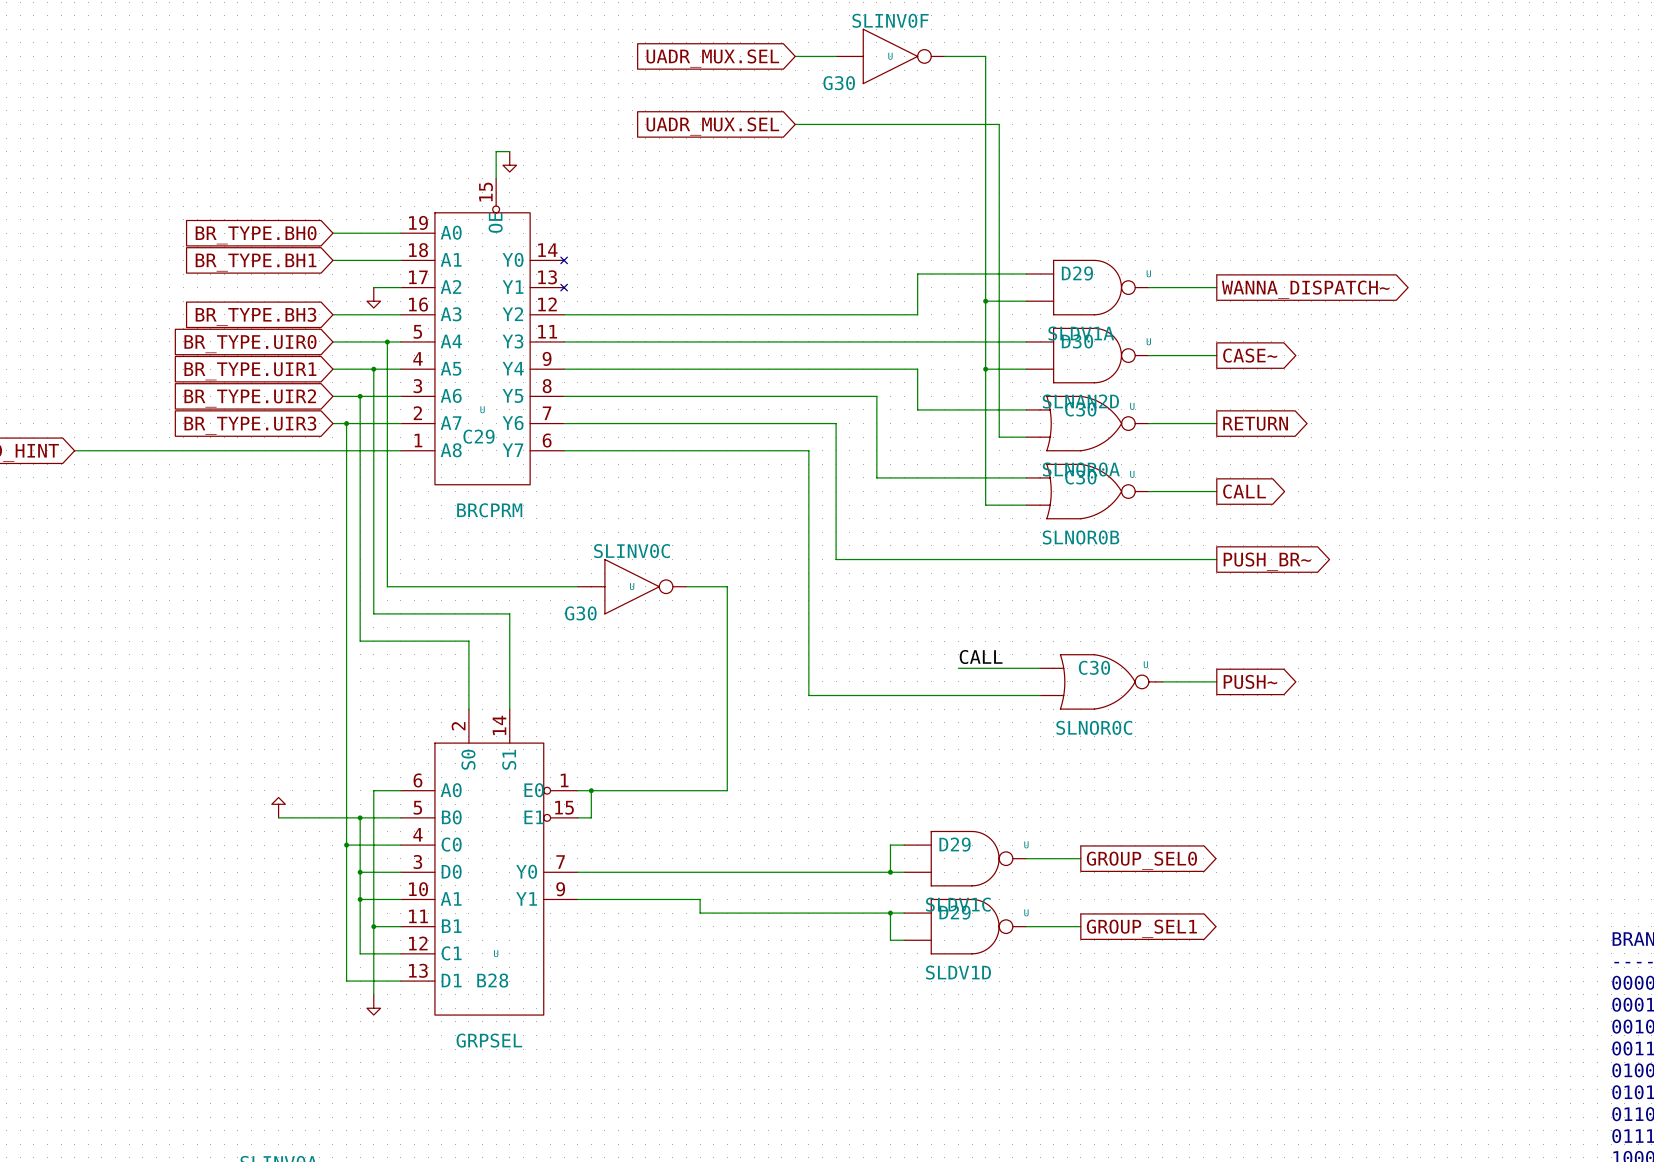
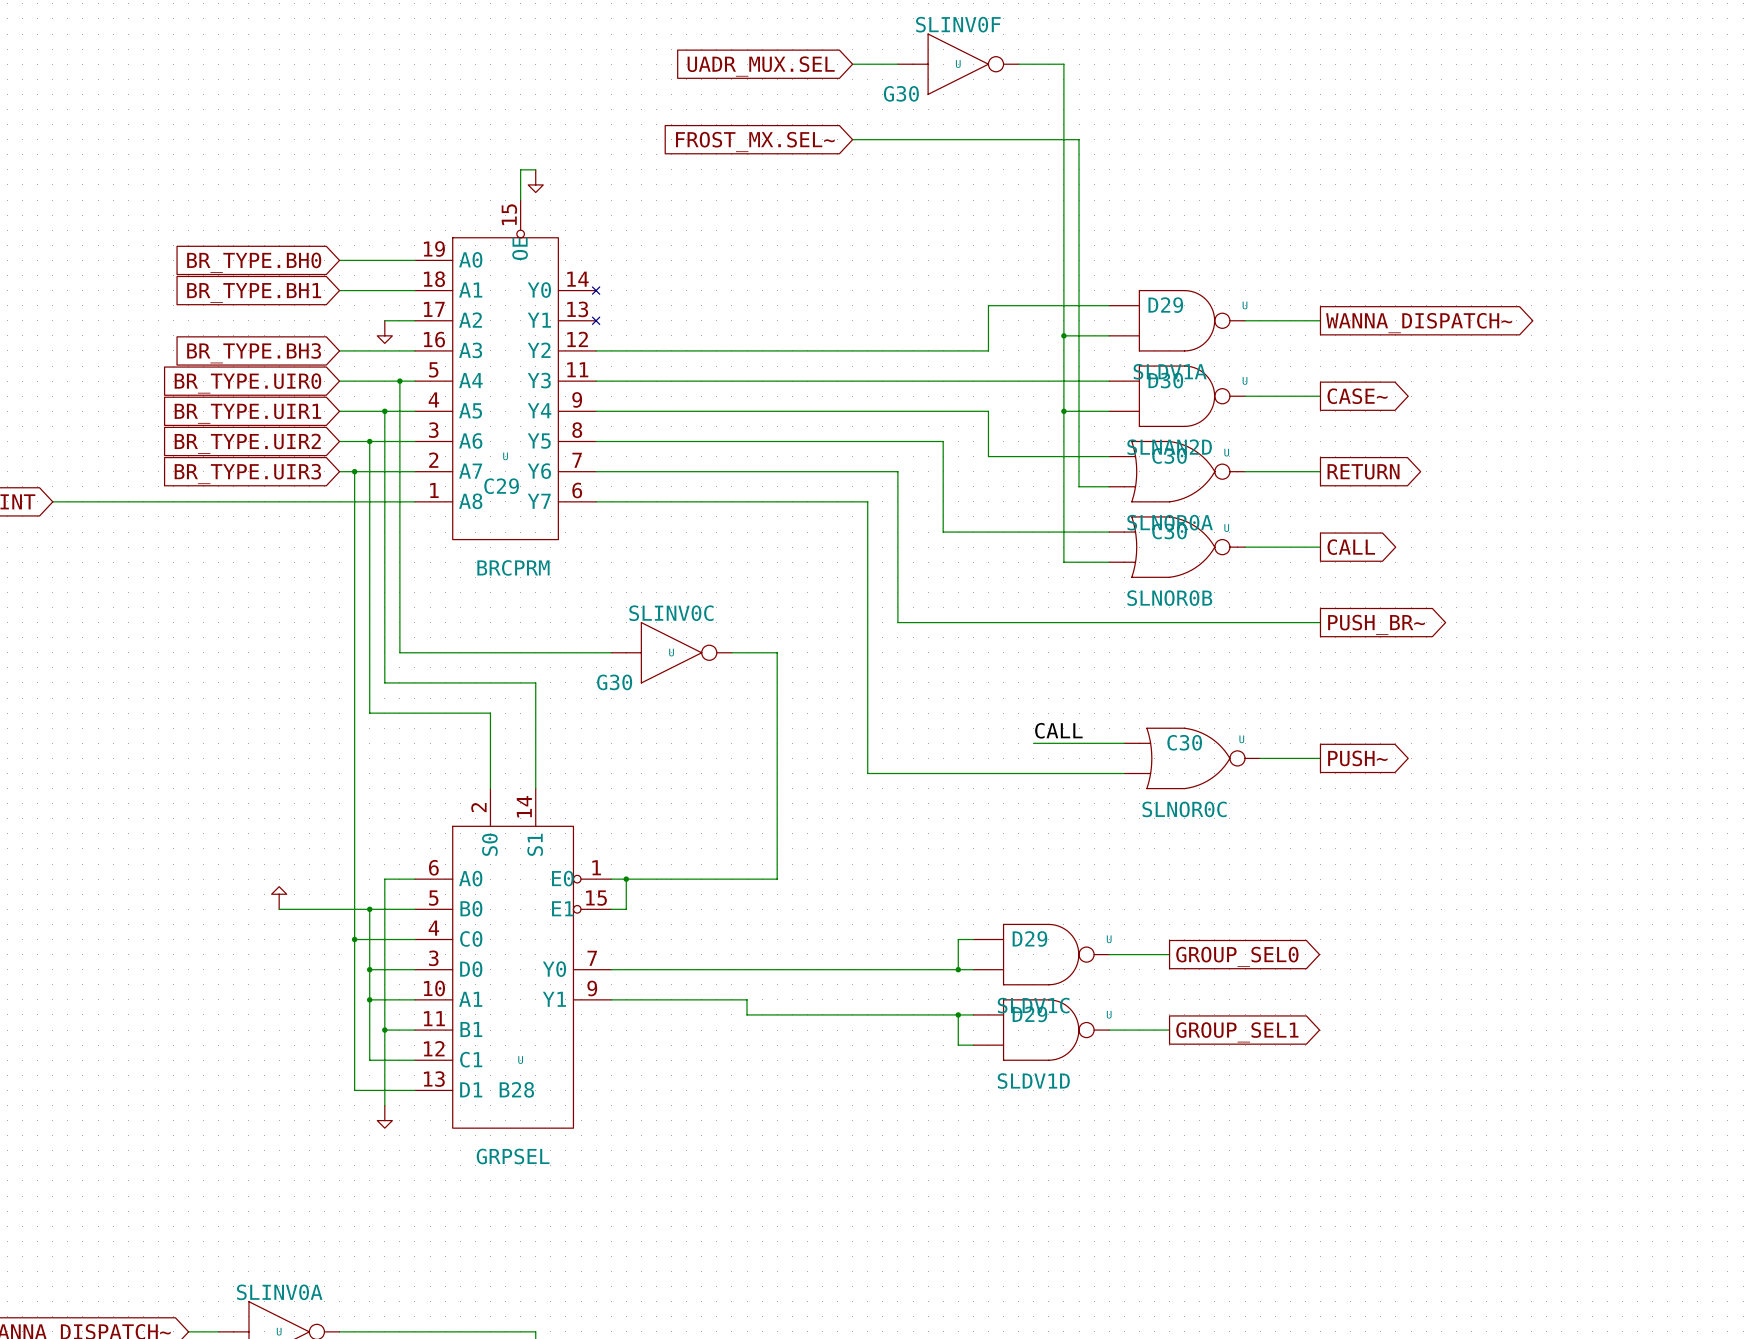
global label: UADR_MUX.SEL (712, 126) -> FROST_MX.SEL~ (755, 141)

